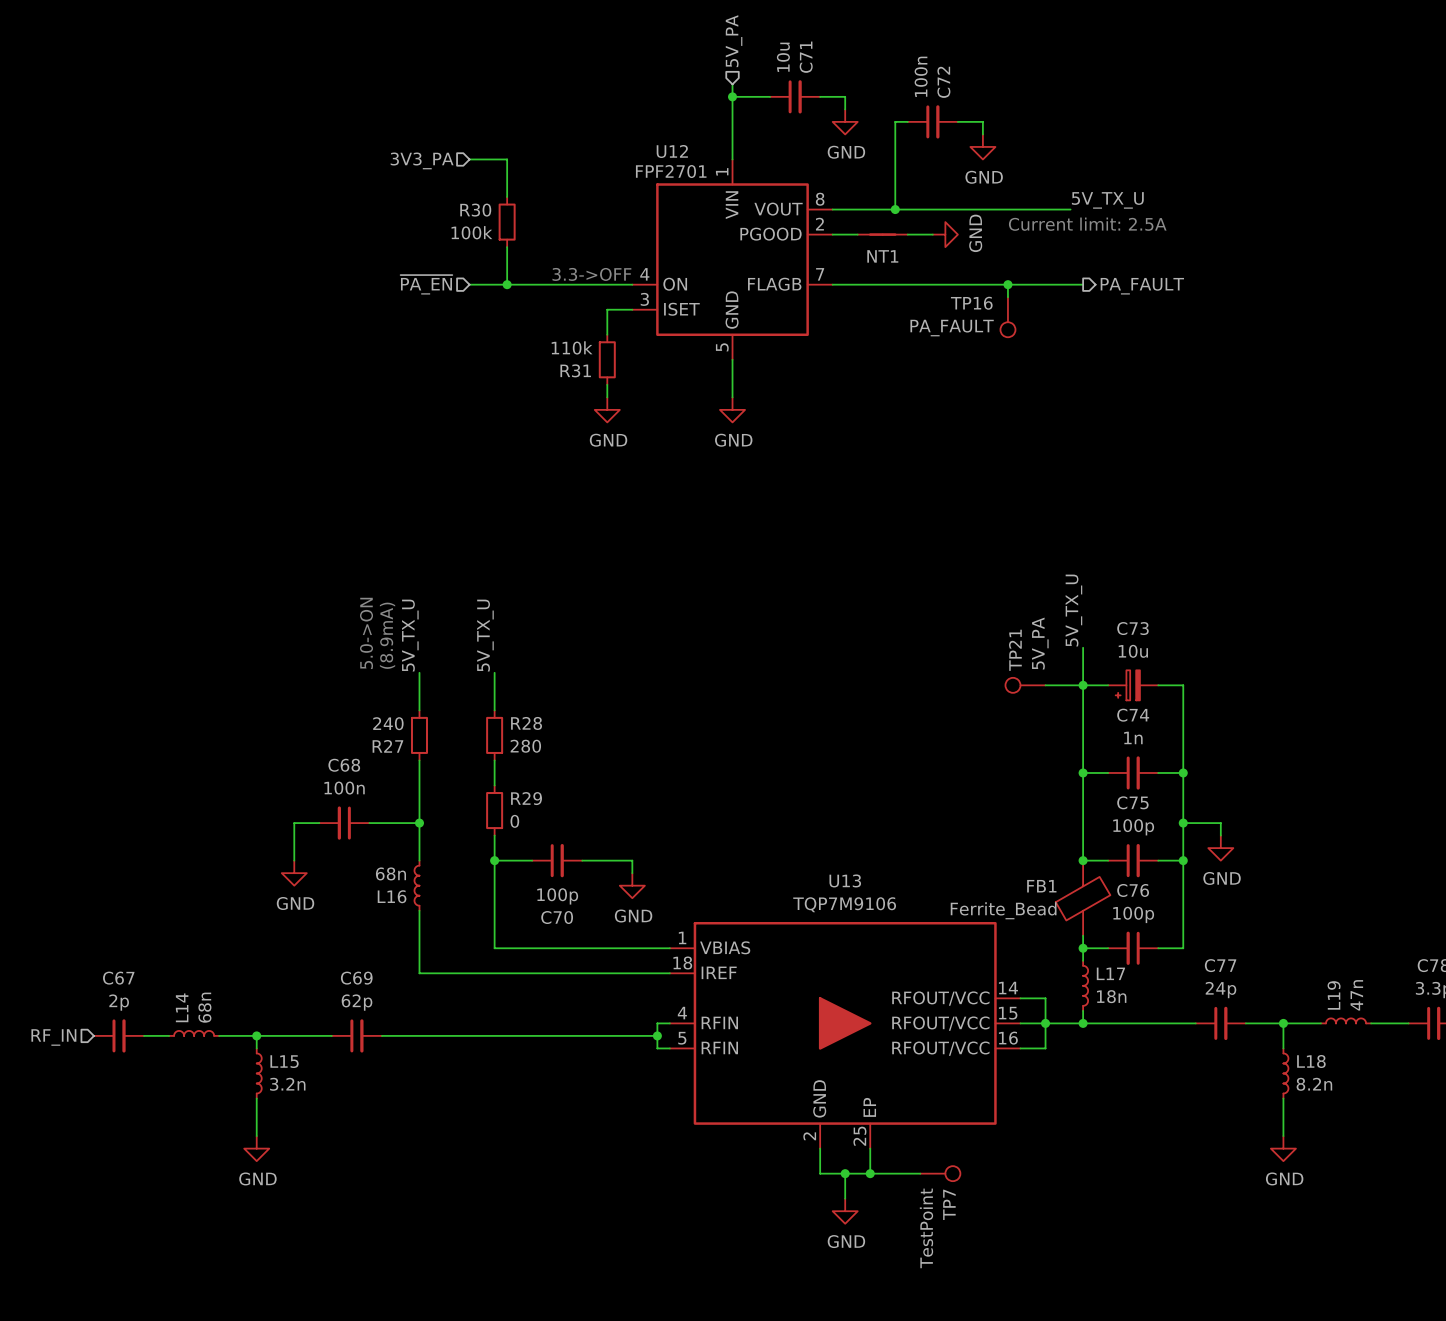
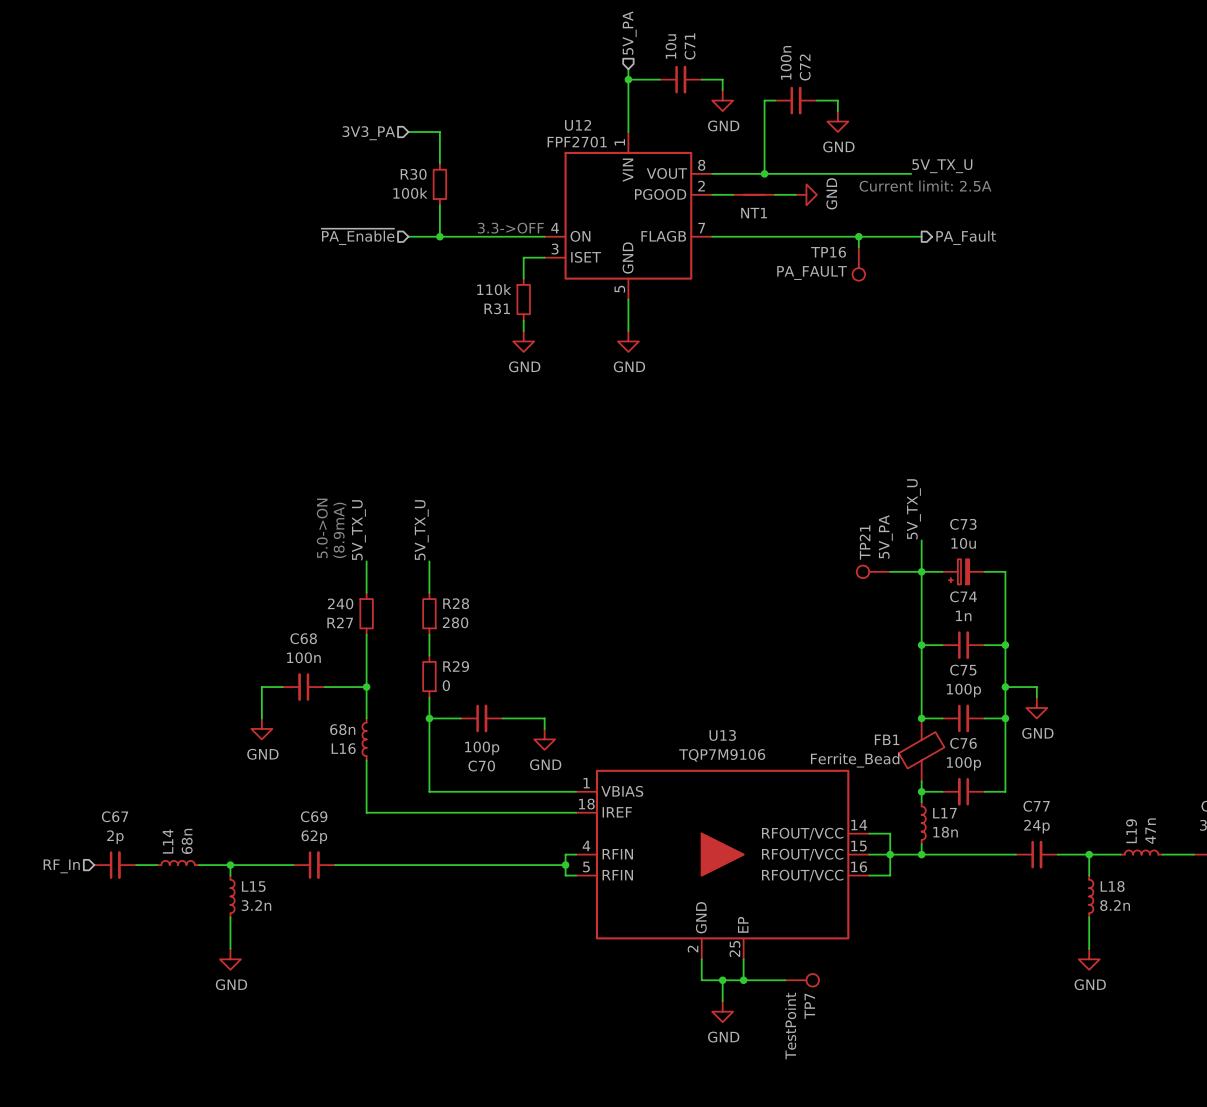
hierarchical label: ~{PA_EN} (426, 284) -> ~{PA_Enable} (358, 236)
hierarchical label: PA_FAULT (1142, 286) -> PA_Fault (966, 237)
hierarchical label: RF_IN (53, 1037) -> RF_In (61, 866)

